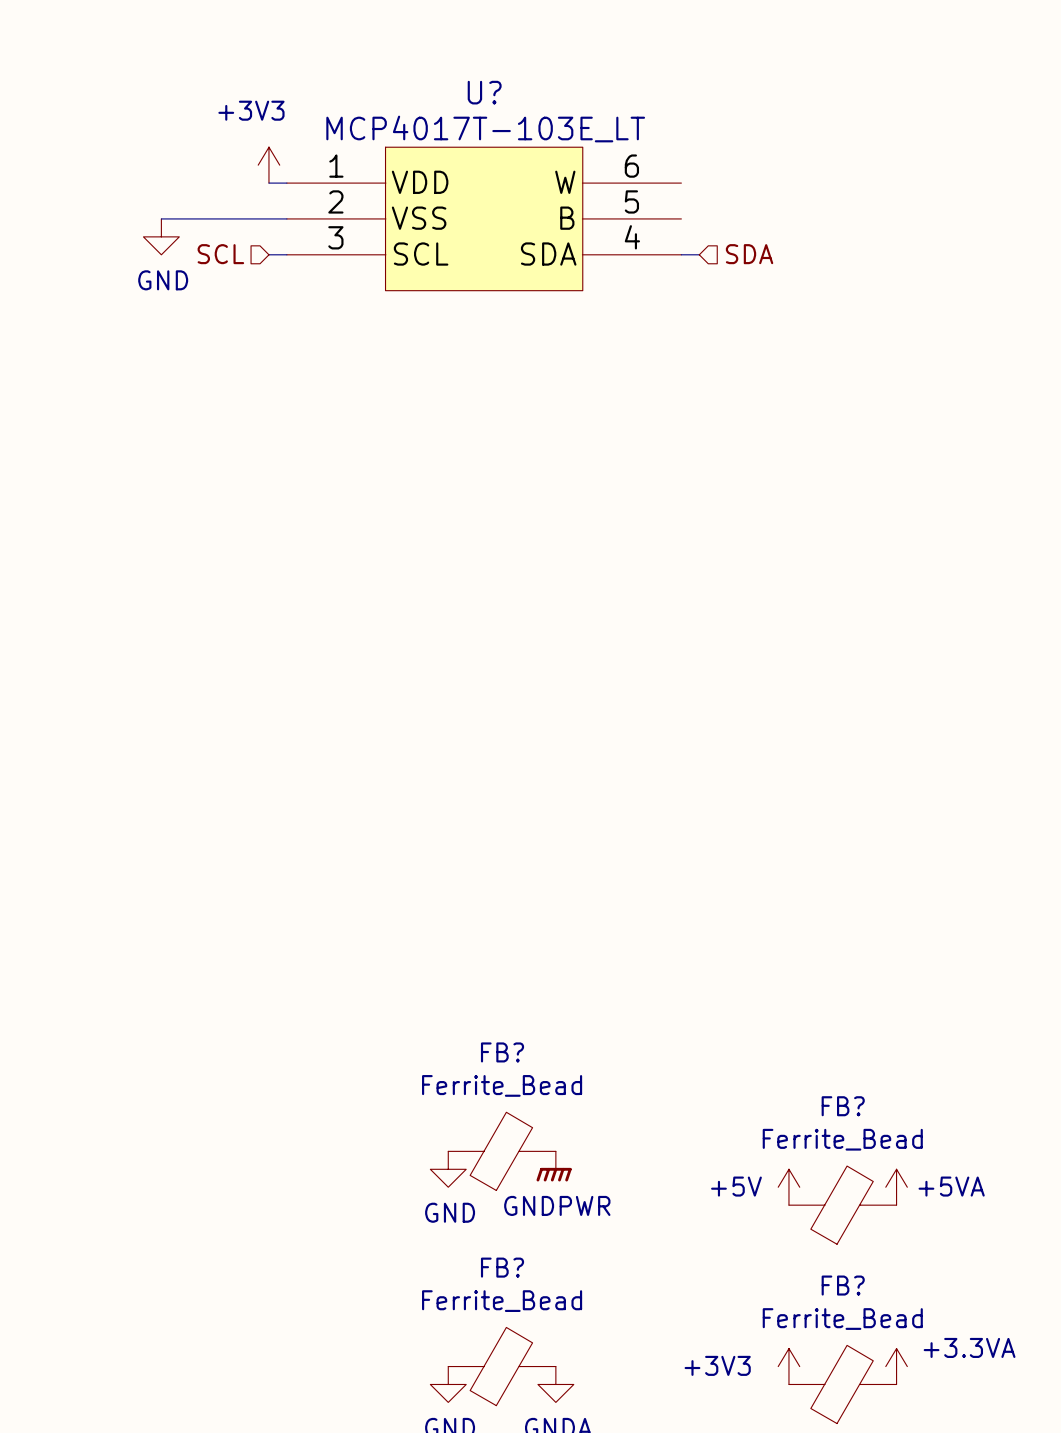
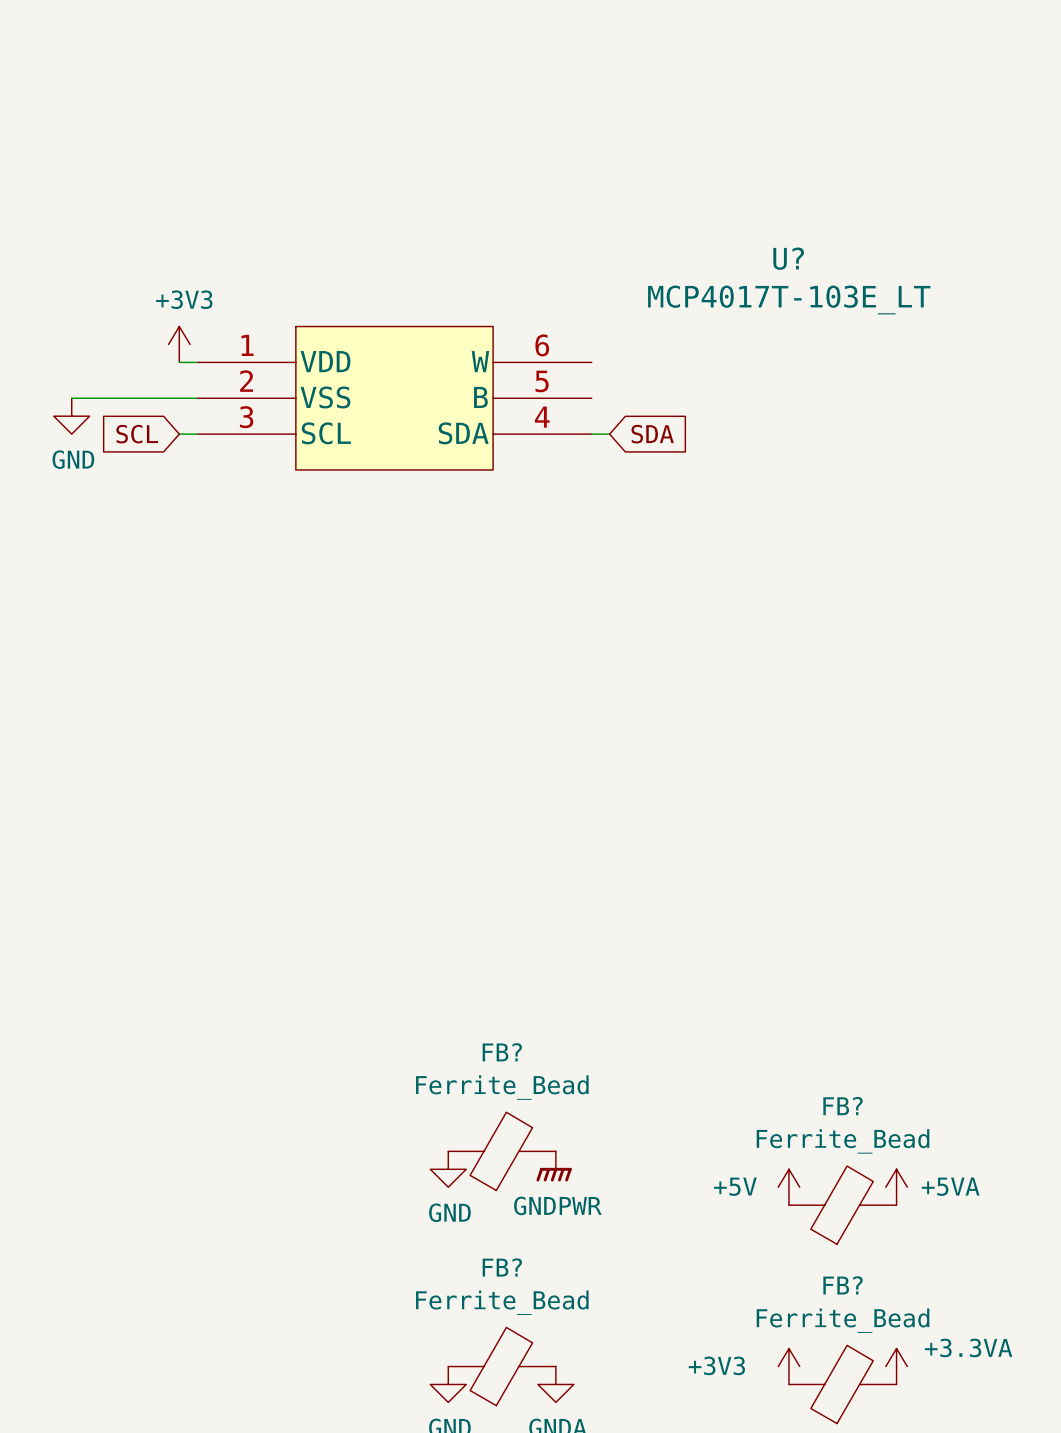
U? name position: U? (484, 92) -> U? (788, 258)
power symbol text position: +3V3 (251, 110) -> +3V3 (184, 299)
U? value position: MCP4017T-103E_LT (485, 129) -> MCP4017T-103E_LT (789, 299)
power symbol position: +3V3 (268, 165) -> +3V3 (179, 344)
wire: (268, 183) (286, 183) -> (179, 362) (197, 362)
wire: (161, 218) (286, 218) -> (71, 398) (197, 398)
U? position: (484, 218) -> (394, 398)
power symbol position: GND (161, 236) -> GND (71, 416)
hierarchical label: SCL (220, 254) -> none
wire: (268, 254) (286, 254) -> (179, 434) (197, 434)
wire: (681, 254) (699, 254) -> (591, 434) (609, 434)
hierarchical label: SDA (749, 254) -> none
global label: none -> SCL (137, 434)
global label: none -> SDA (652, 434)

